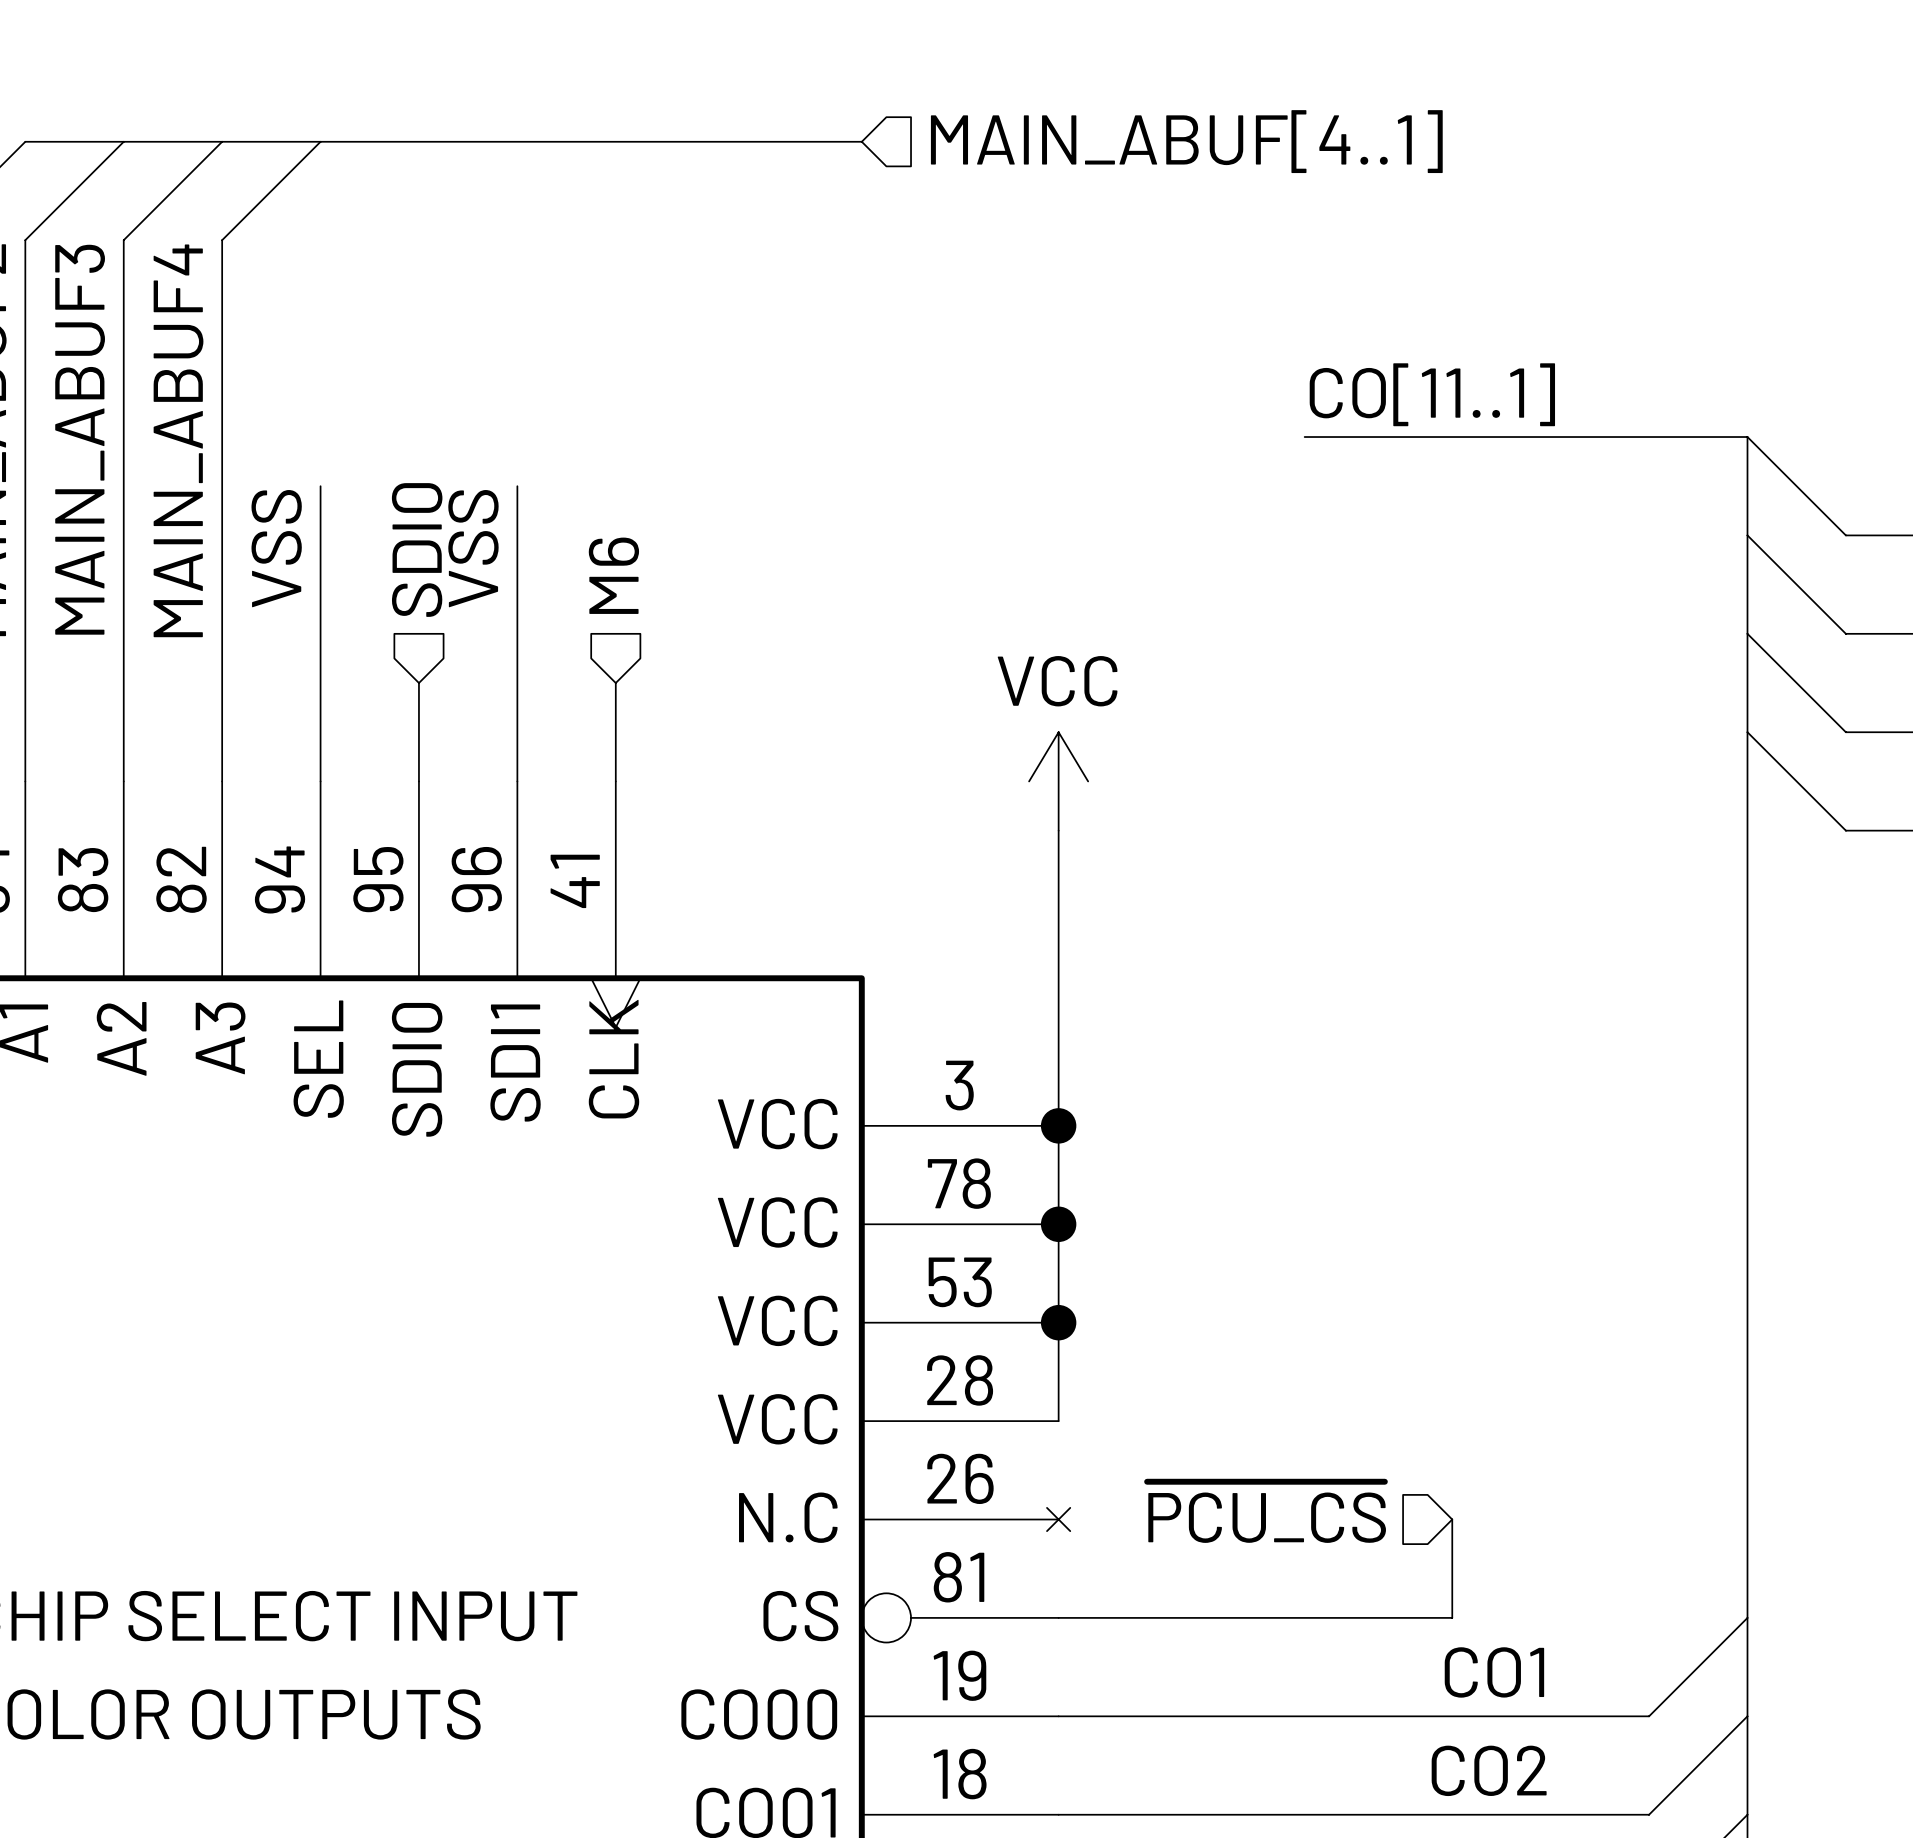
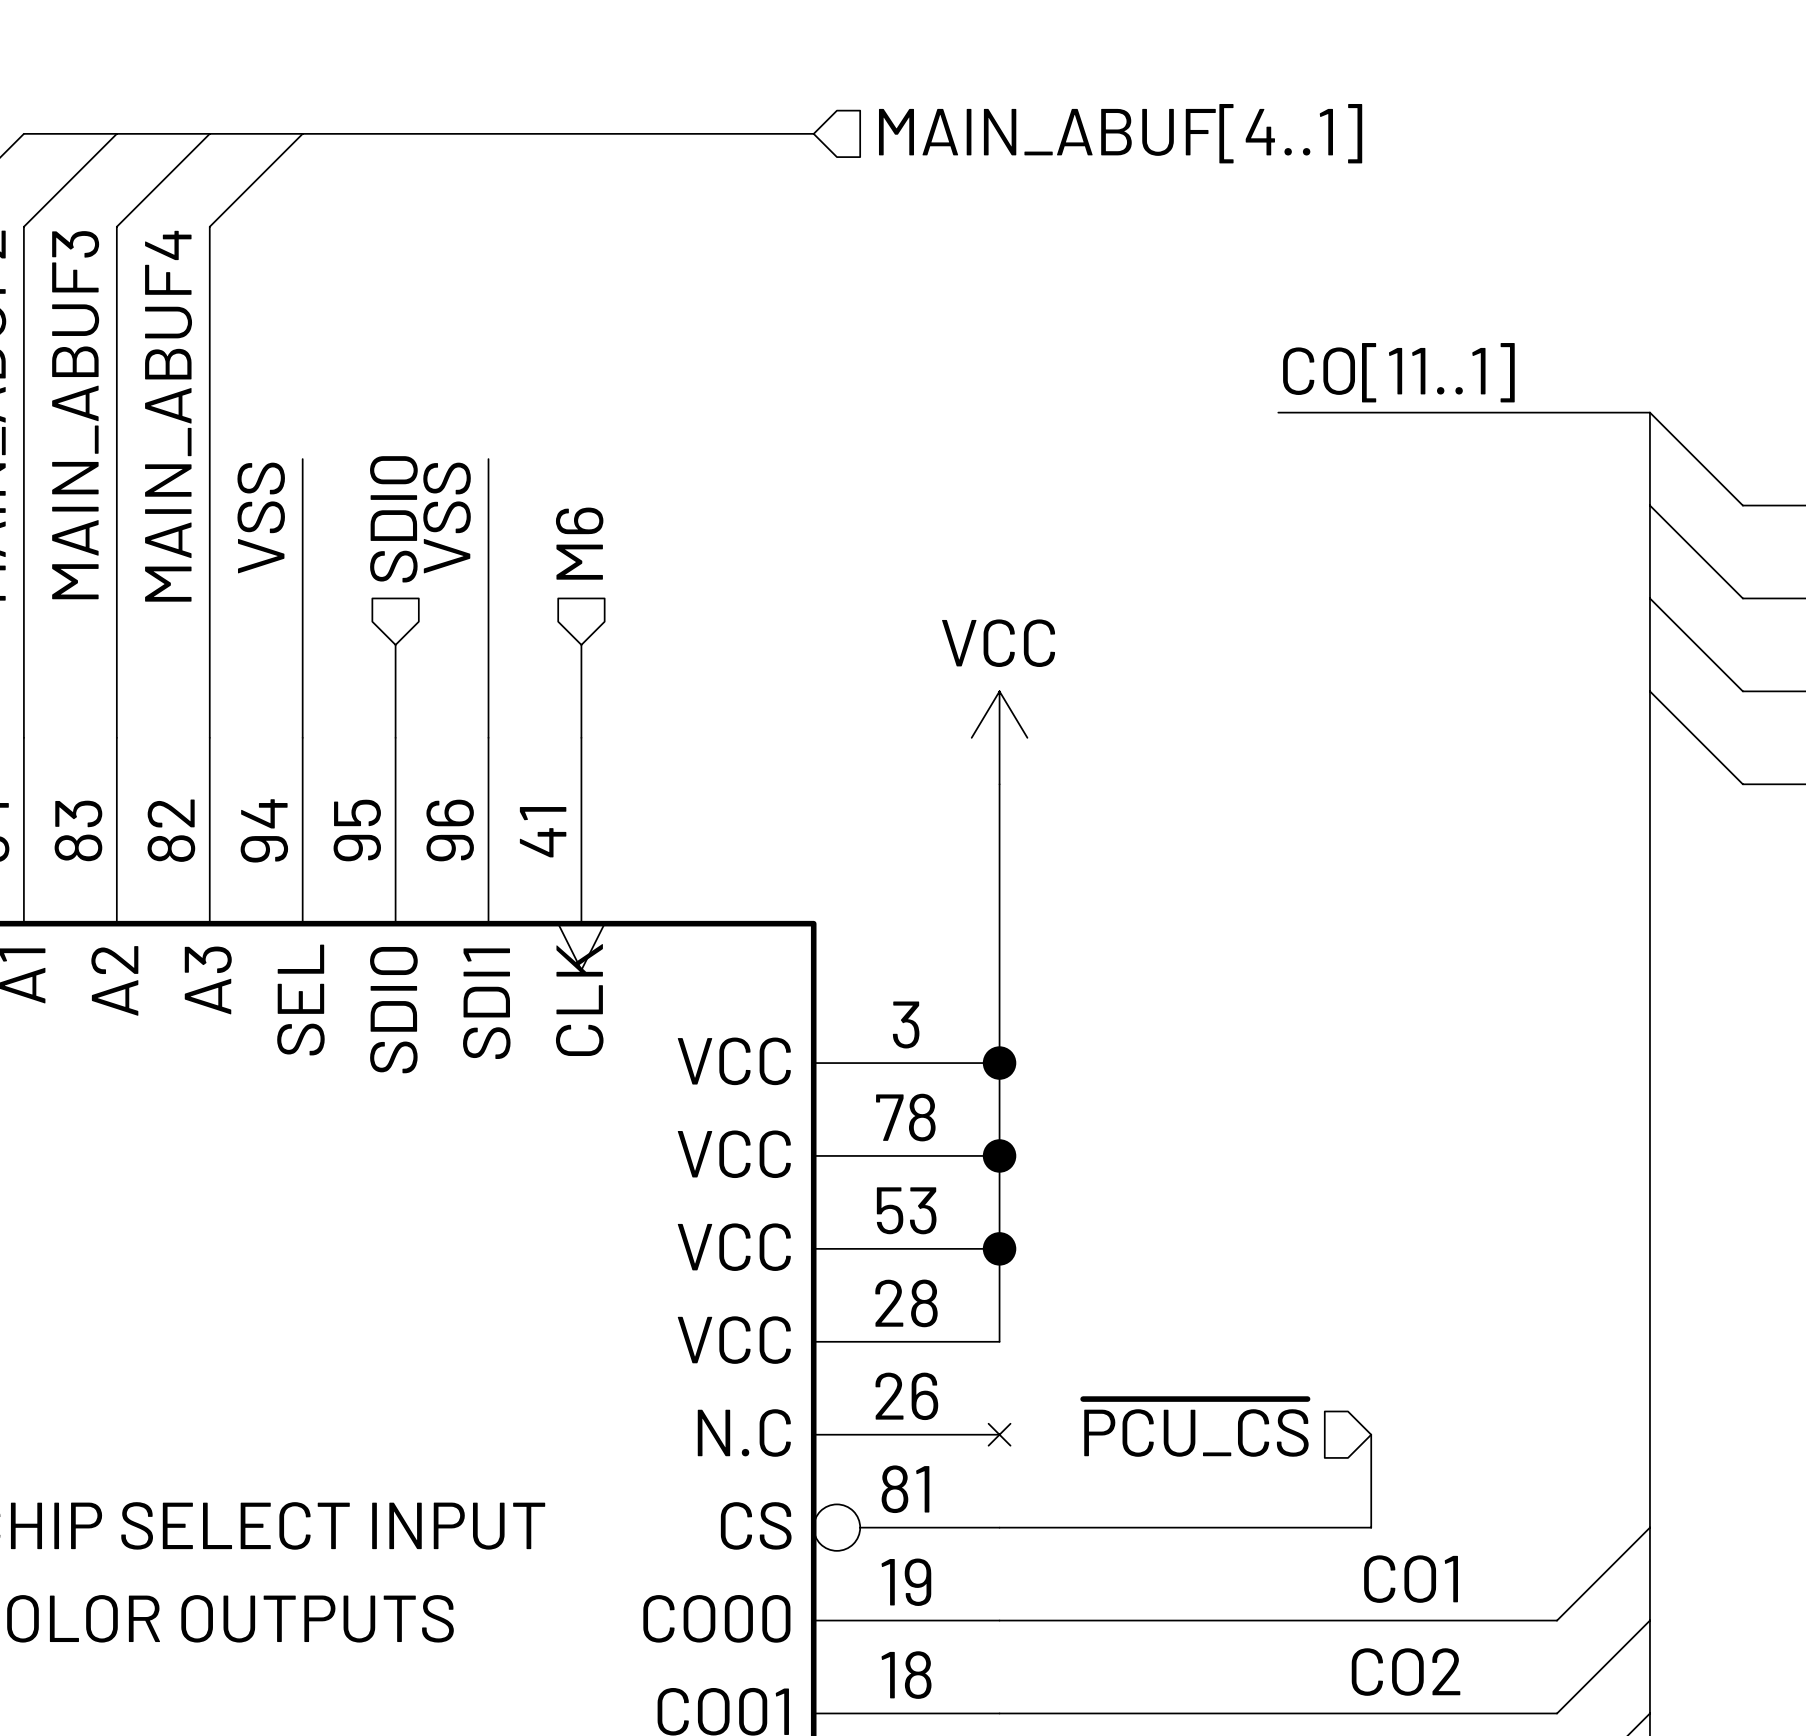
label position: CO[11..1] (1432, 394) -> CO[11..1] (1398, 372)
bus: (1304, 437) (1353, 437) -> none

